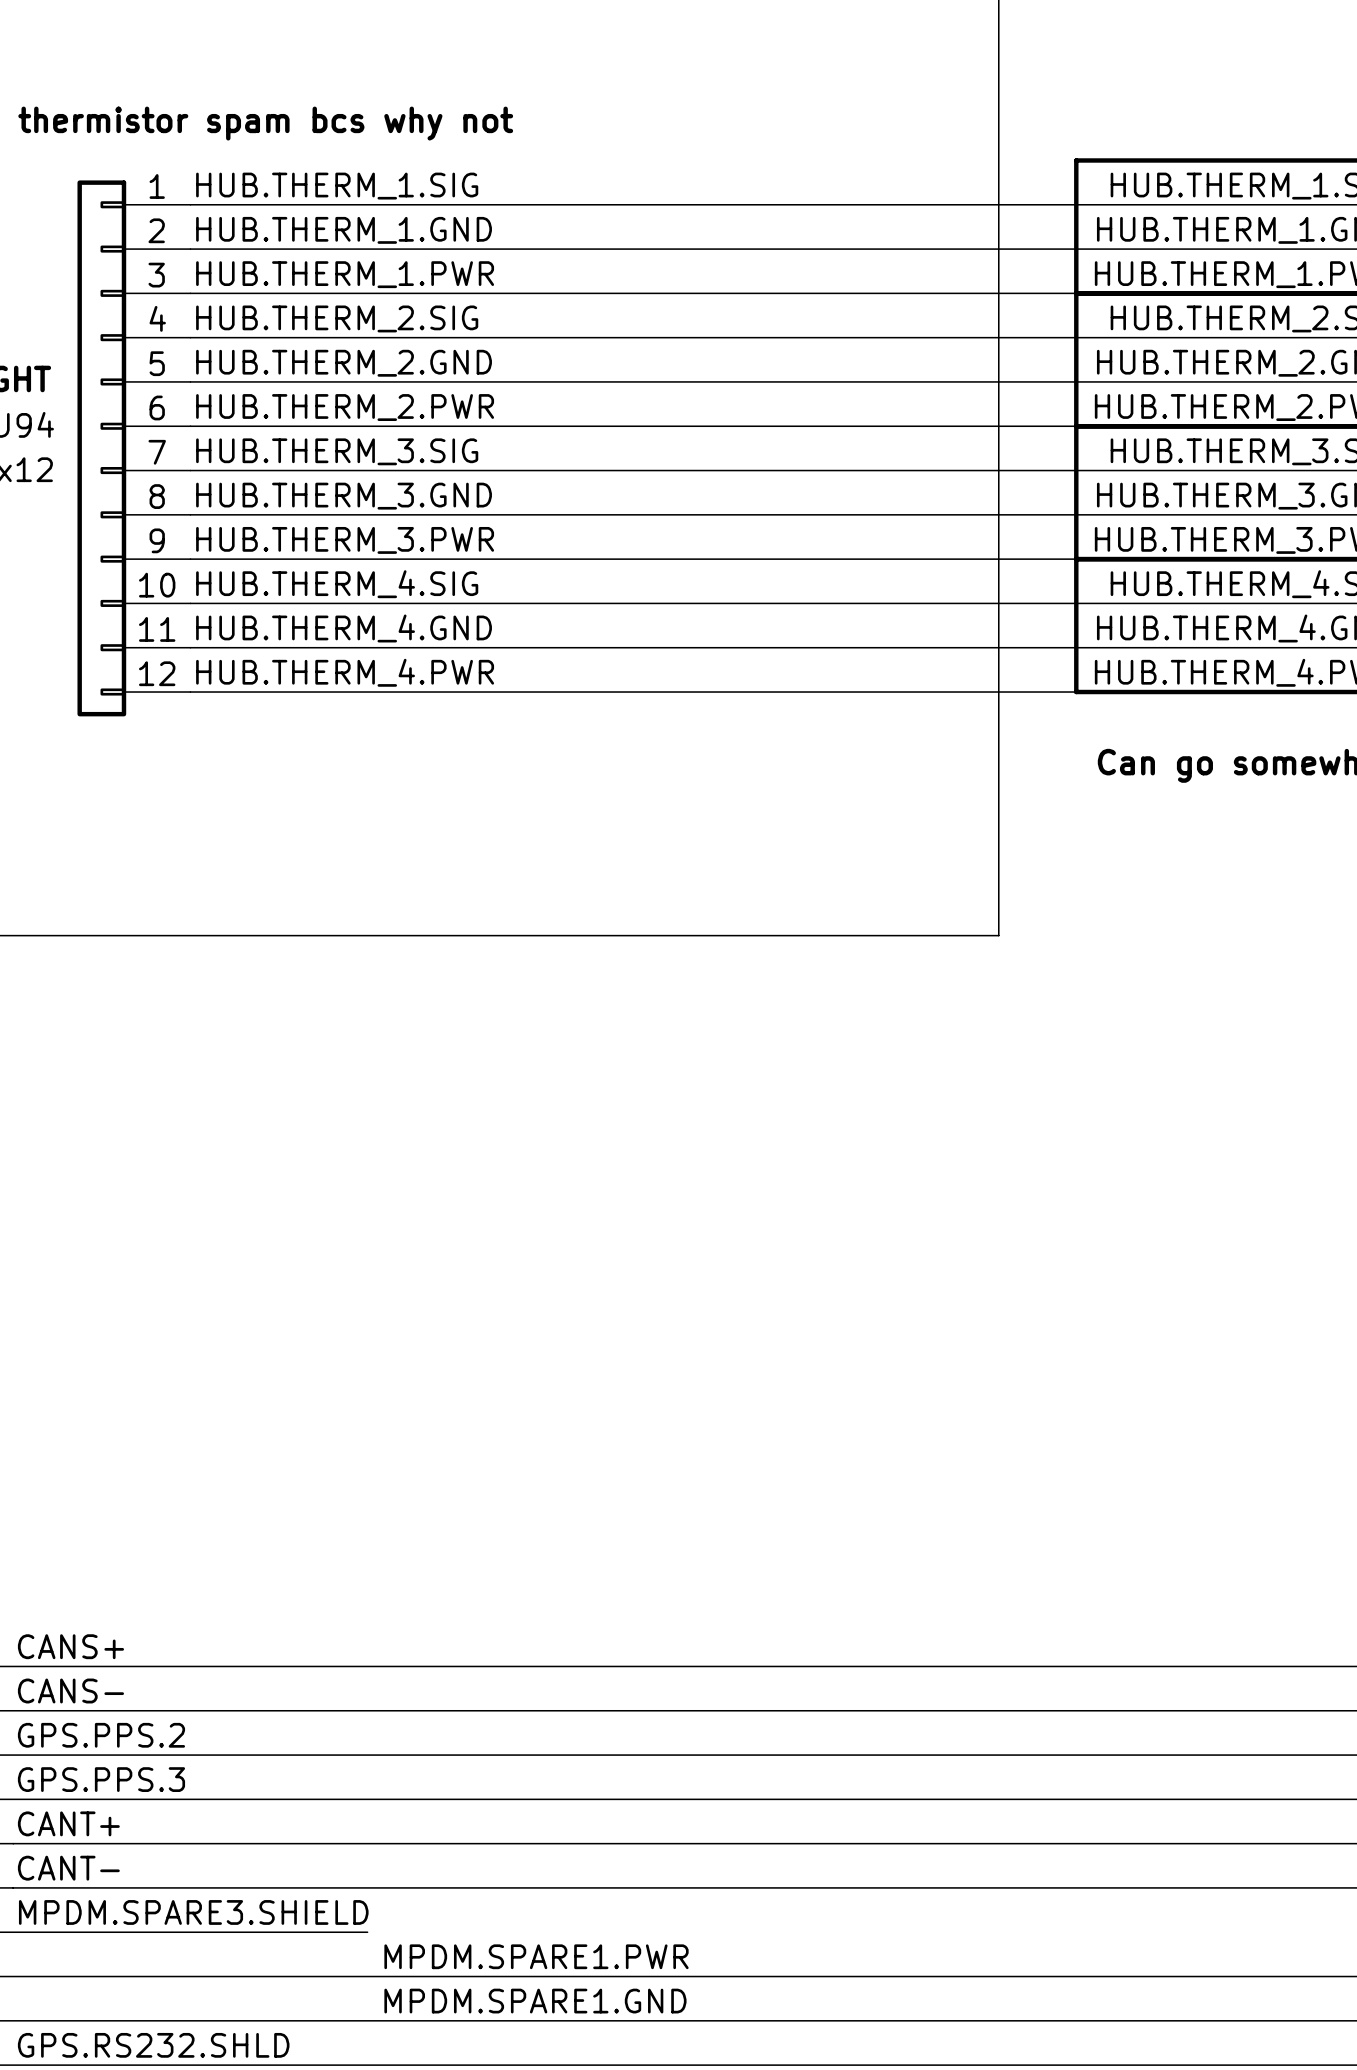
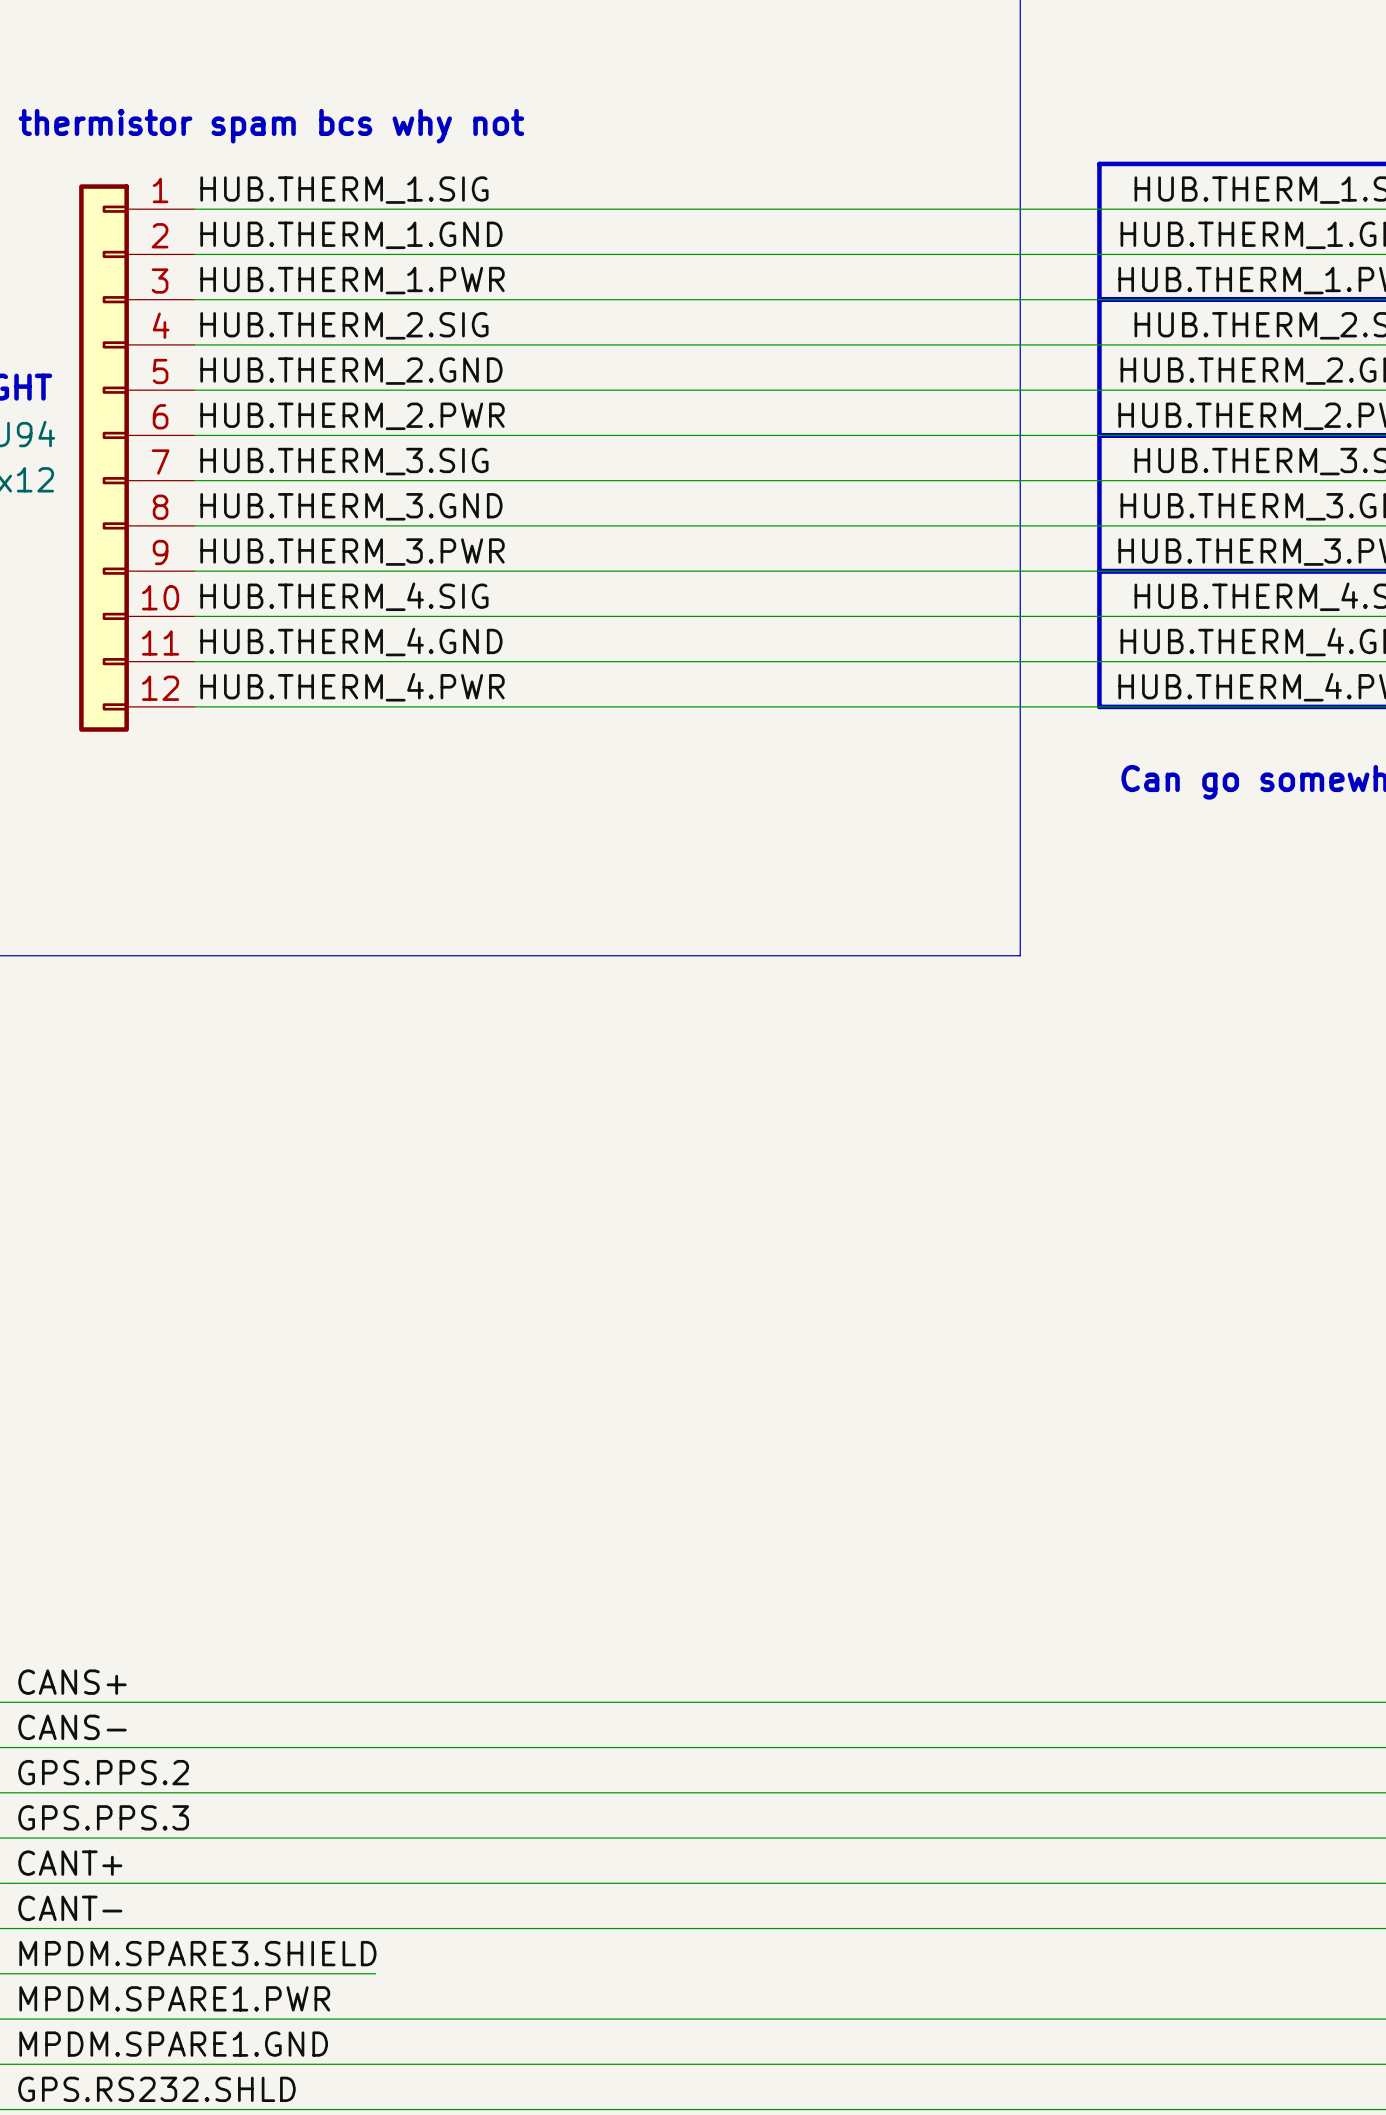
label position: MPDM.SPARE1.PWR (536, 1956) -> MPDM.SPARE1.PWR (174, 1998)
label position: MPDM.SPARE1.GND (535, 2001) -> MPDM.SPARE1.GND (173, 2044)

